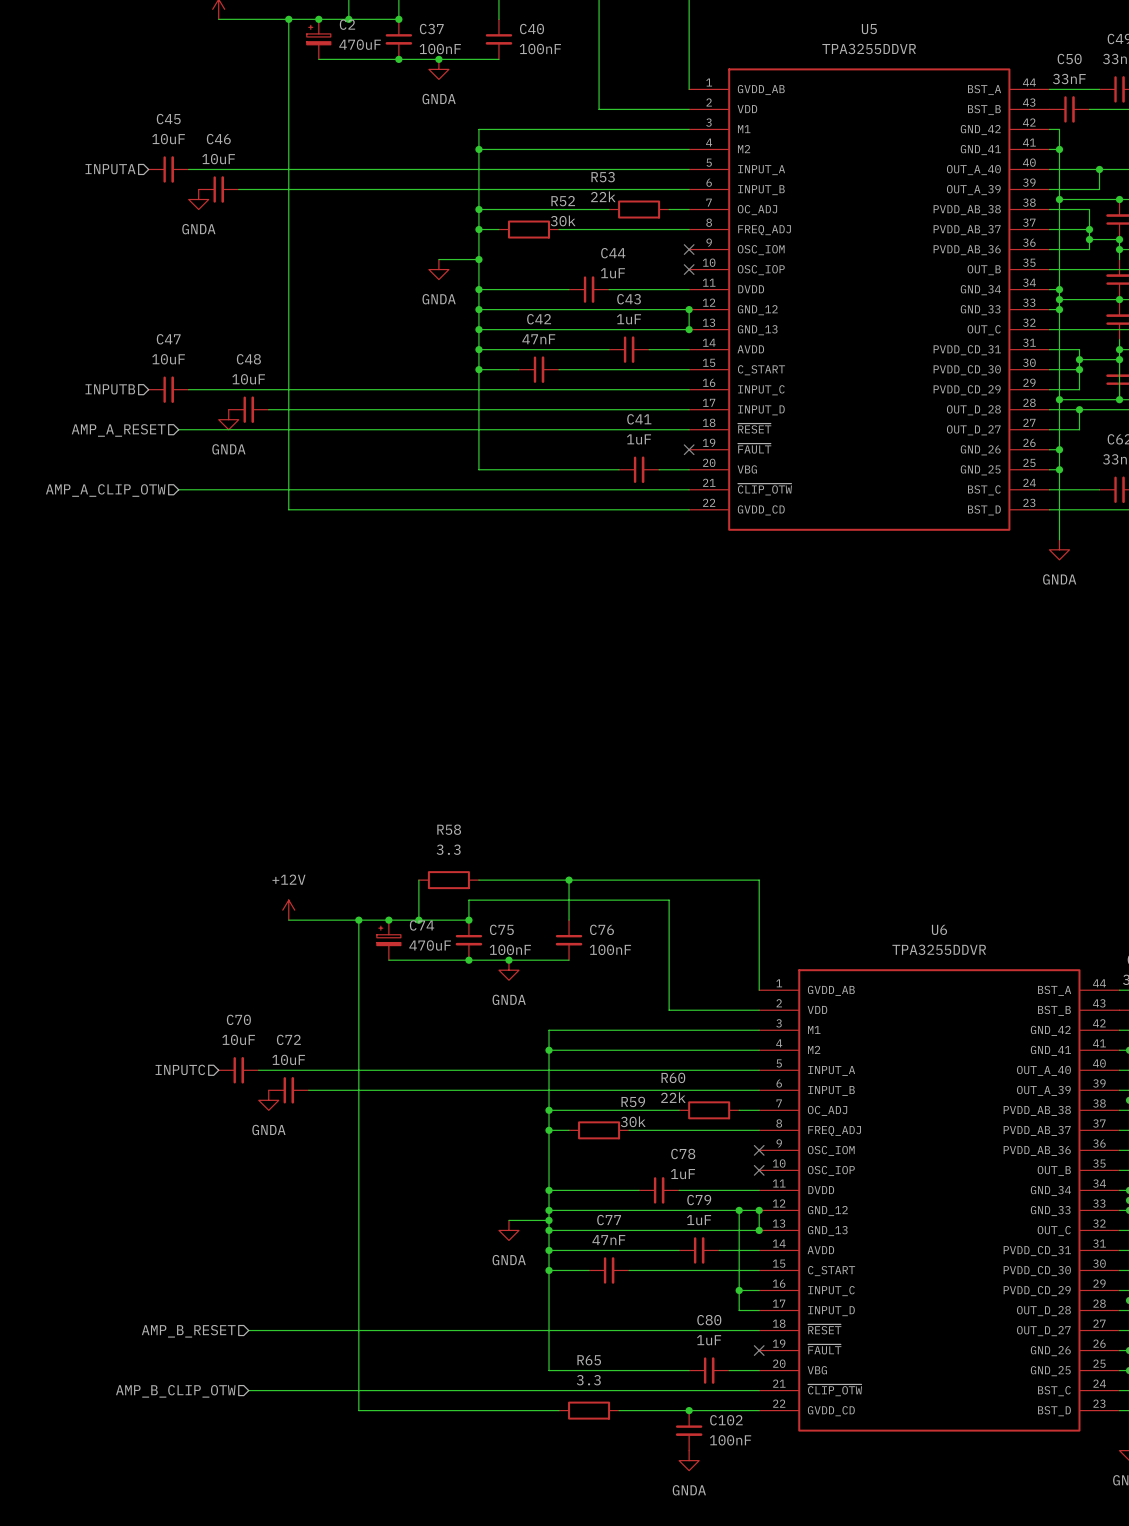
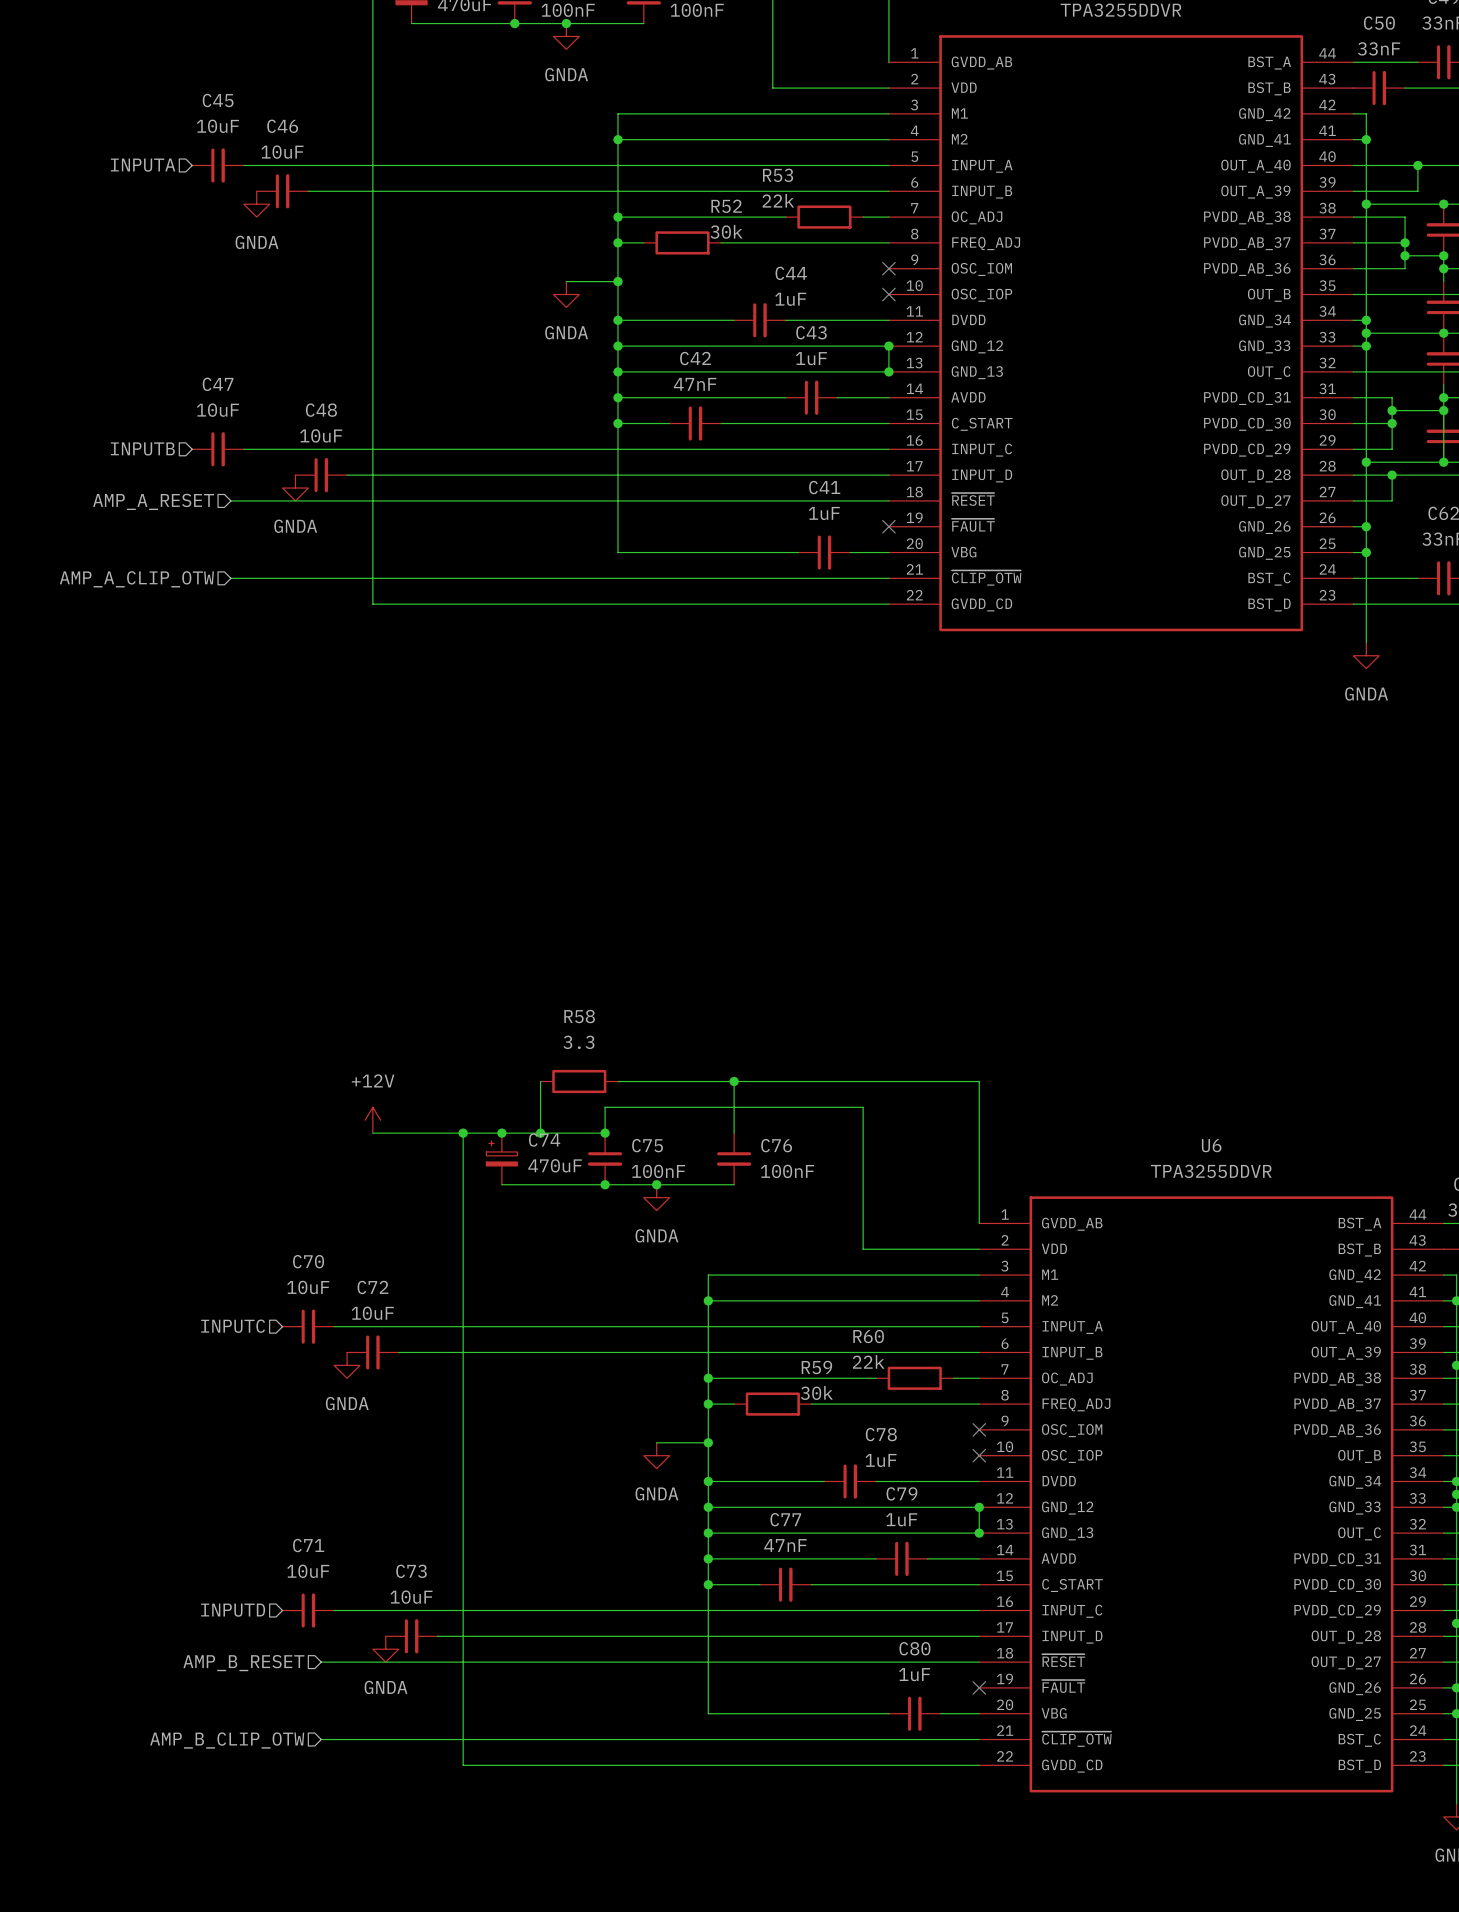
junction: none -> (708, 1442)
wire: (739, 1210) (739, 1310) -> (437, 1636) (953, 1636)
junction: (739, 1210) -> none
wire: (508, 1220) (549, 1220) -> (656, 1442) (708, 1442)
junction: (549, 1220) -> none
power symbol position: GNDA (508, 1230) -> GNDA (656, 1455)
hierarchical label: none -> INPUTD (233, 1610)
C71: none -> 10uF (308, 1610)
wire: none -> (334, 1610) (953, 1610)
junction: (739, 1290) -> none
C73: none -> 10uF (411, 1636)
power symbol: none -> GNDA (385, 1649)
wire: none -> (721, 1765) (798, 1765)
R65: 3.3 (589, 1410) -> none
junction: (689, 1410) -> none
C102: 100nF (689, 1430) -> none
power symbol: GNDA (689, 1460) -> none

